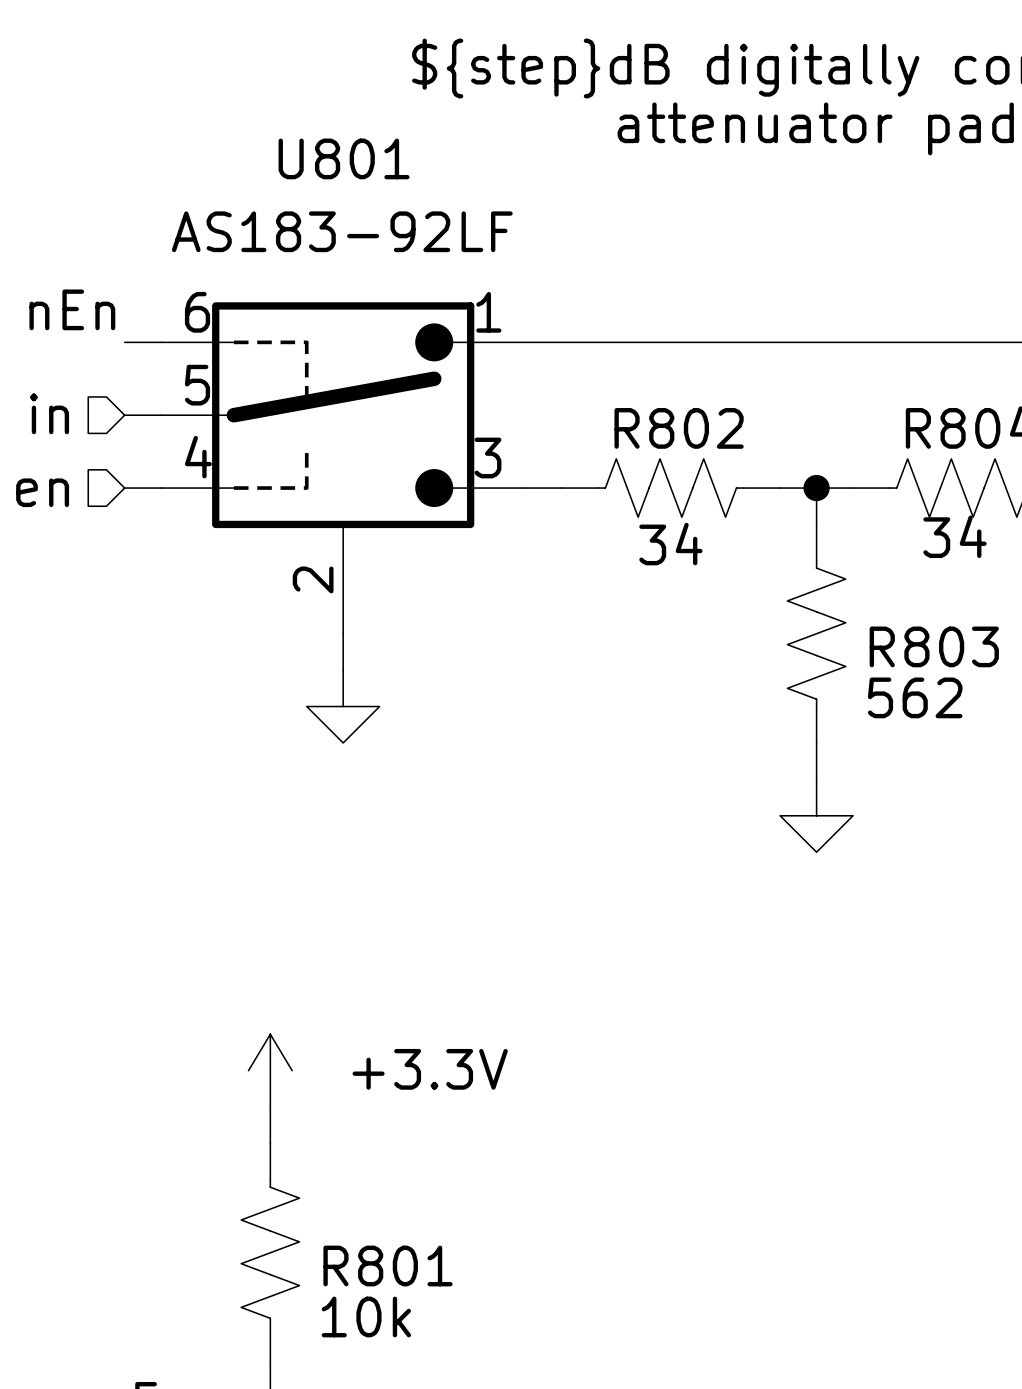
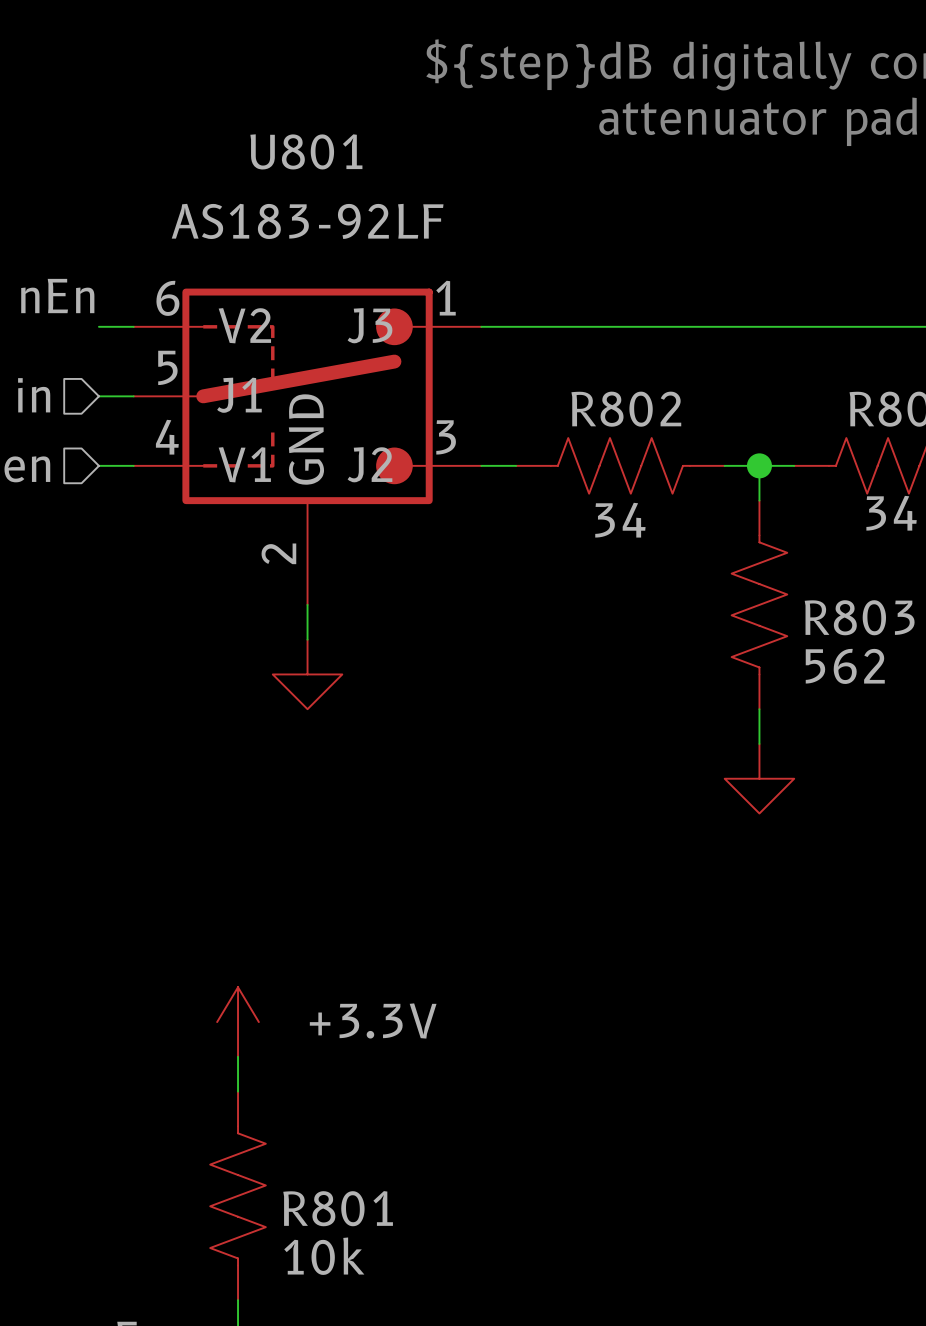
U801 pin name: none -> V2 (244, 325)
U801 pin name: none -> J3 (370, 325)
U801 pin name: none -> J1 (239, 395)
U801 pin name: none -> GND (306, 439)
U801 pin name: none -> V1 (244, 464)
U801 pin name: none -> J2 (369, 464)

